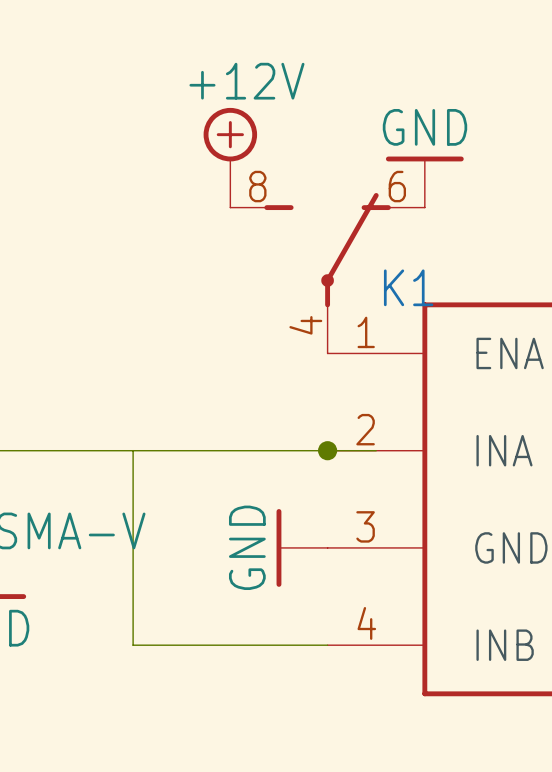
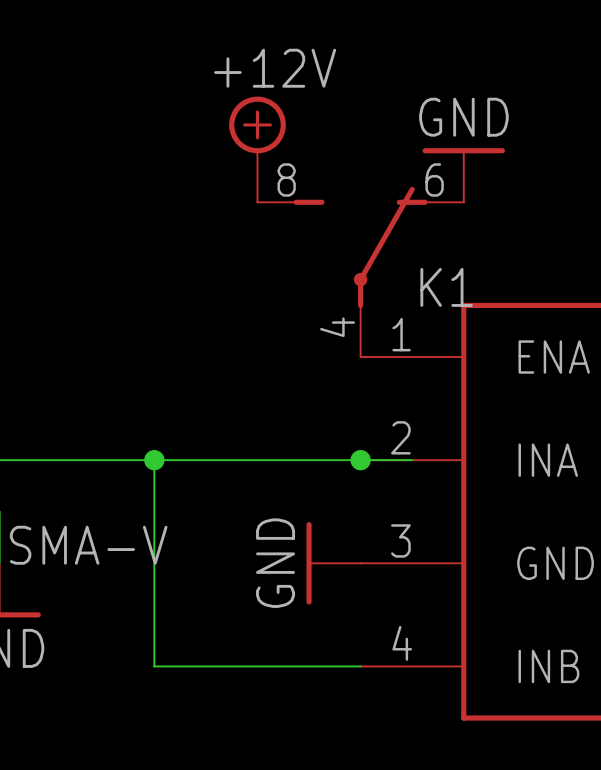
junction: none -> (154, 460)

